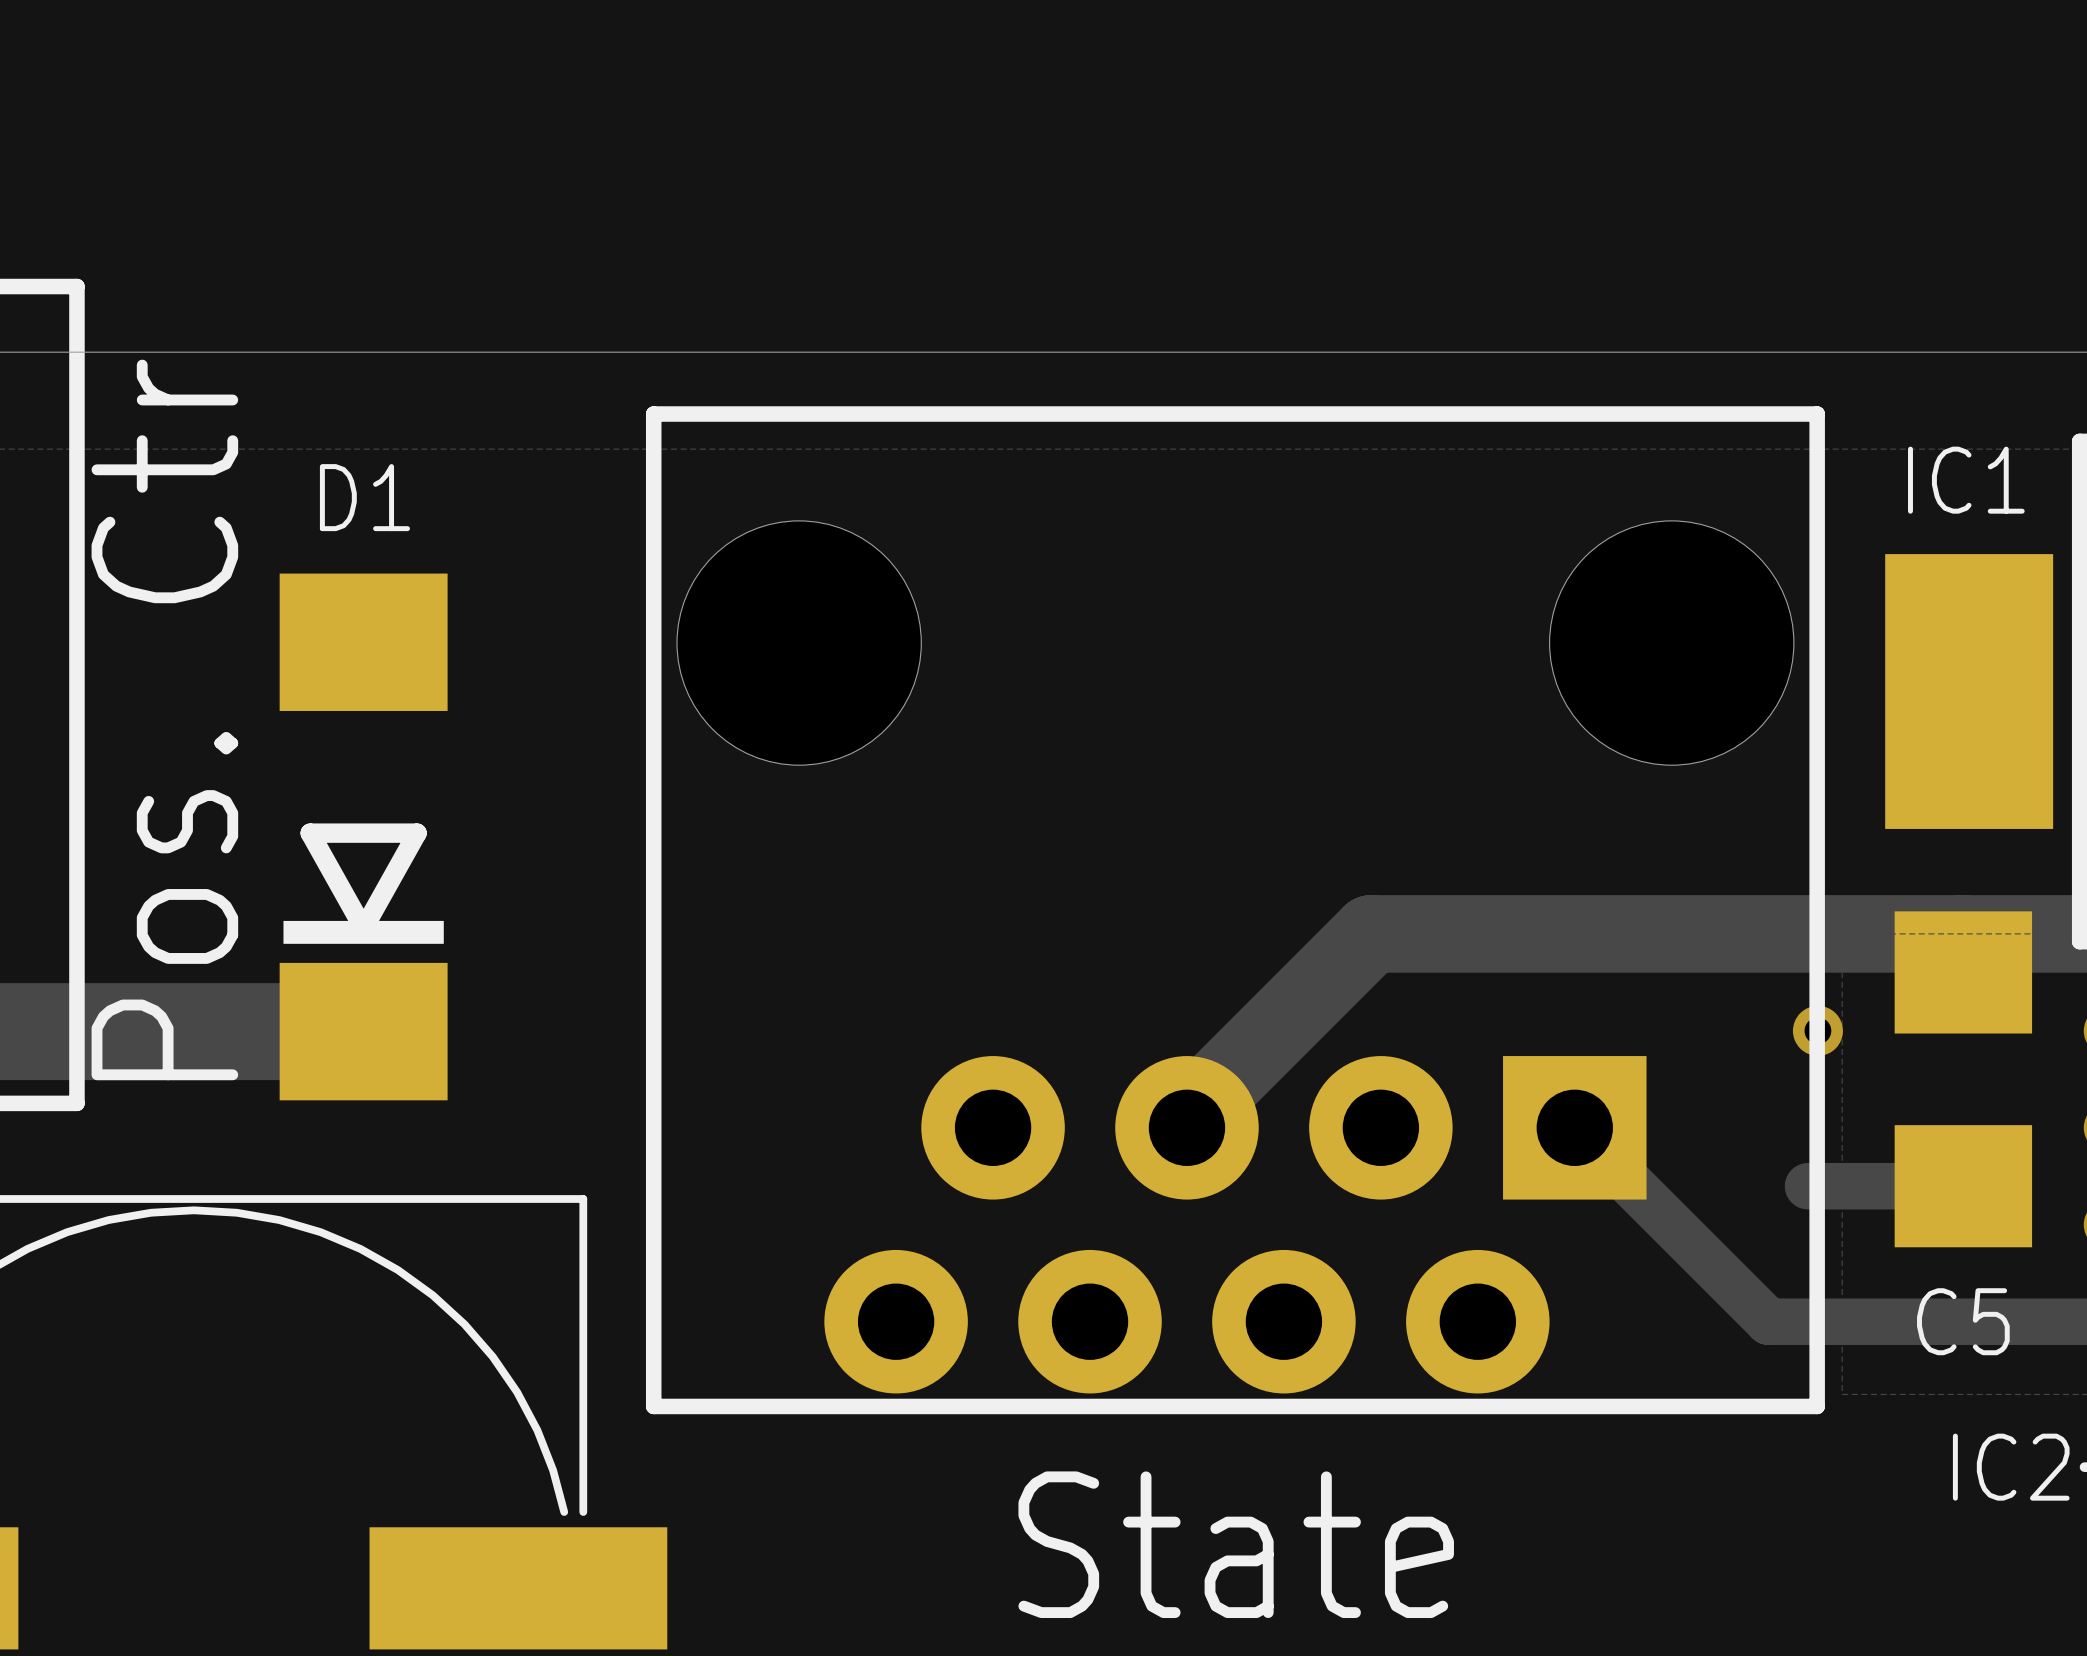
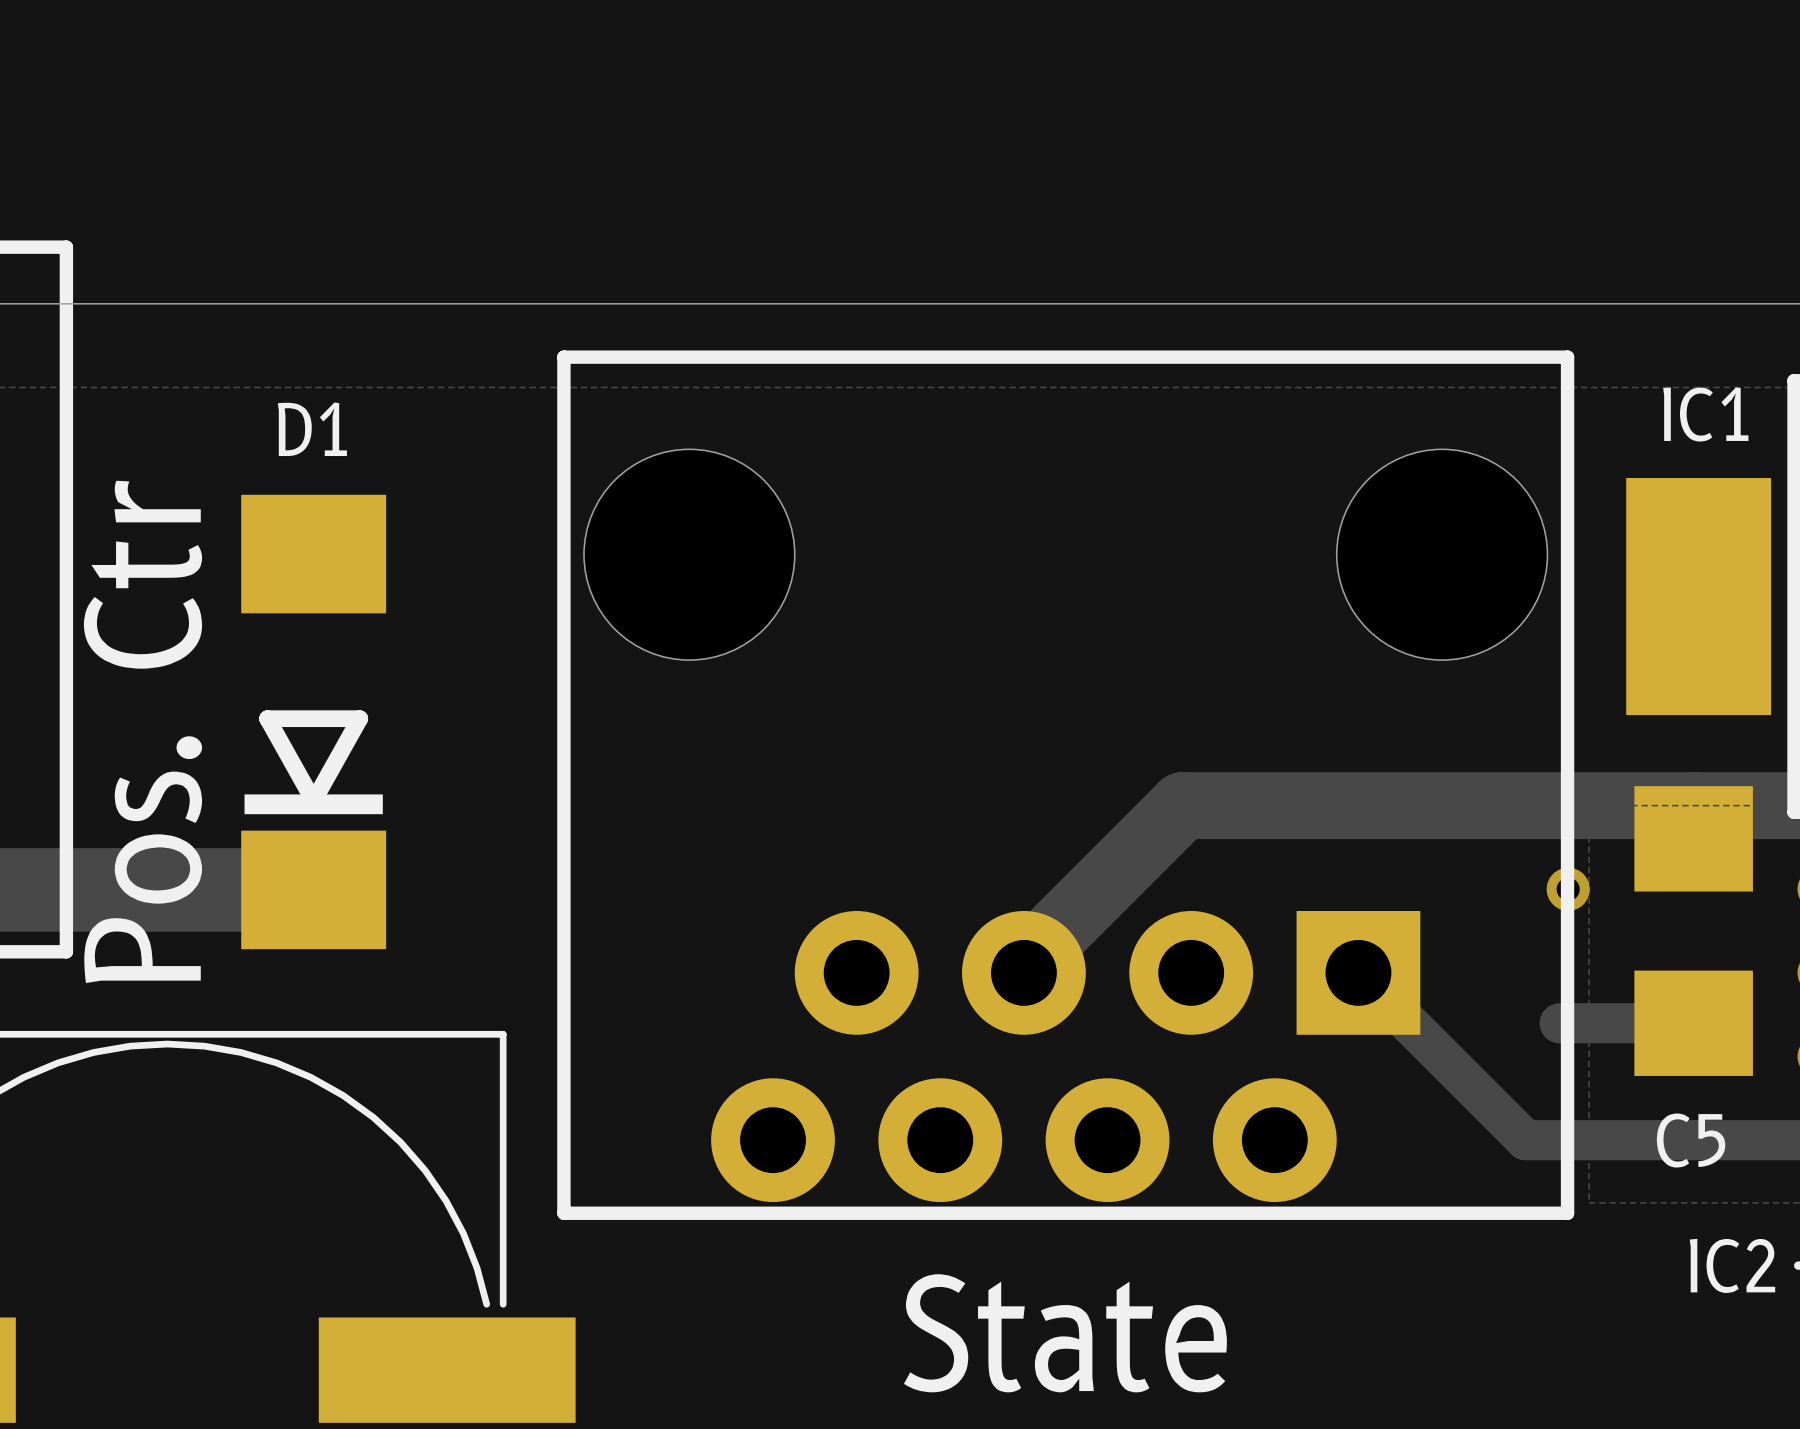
text position: Pos. Ctr (164, 719) -> Pos. Ctr (142, 731)

